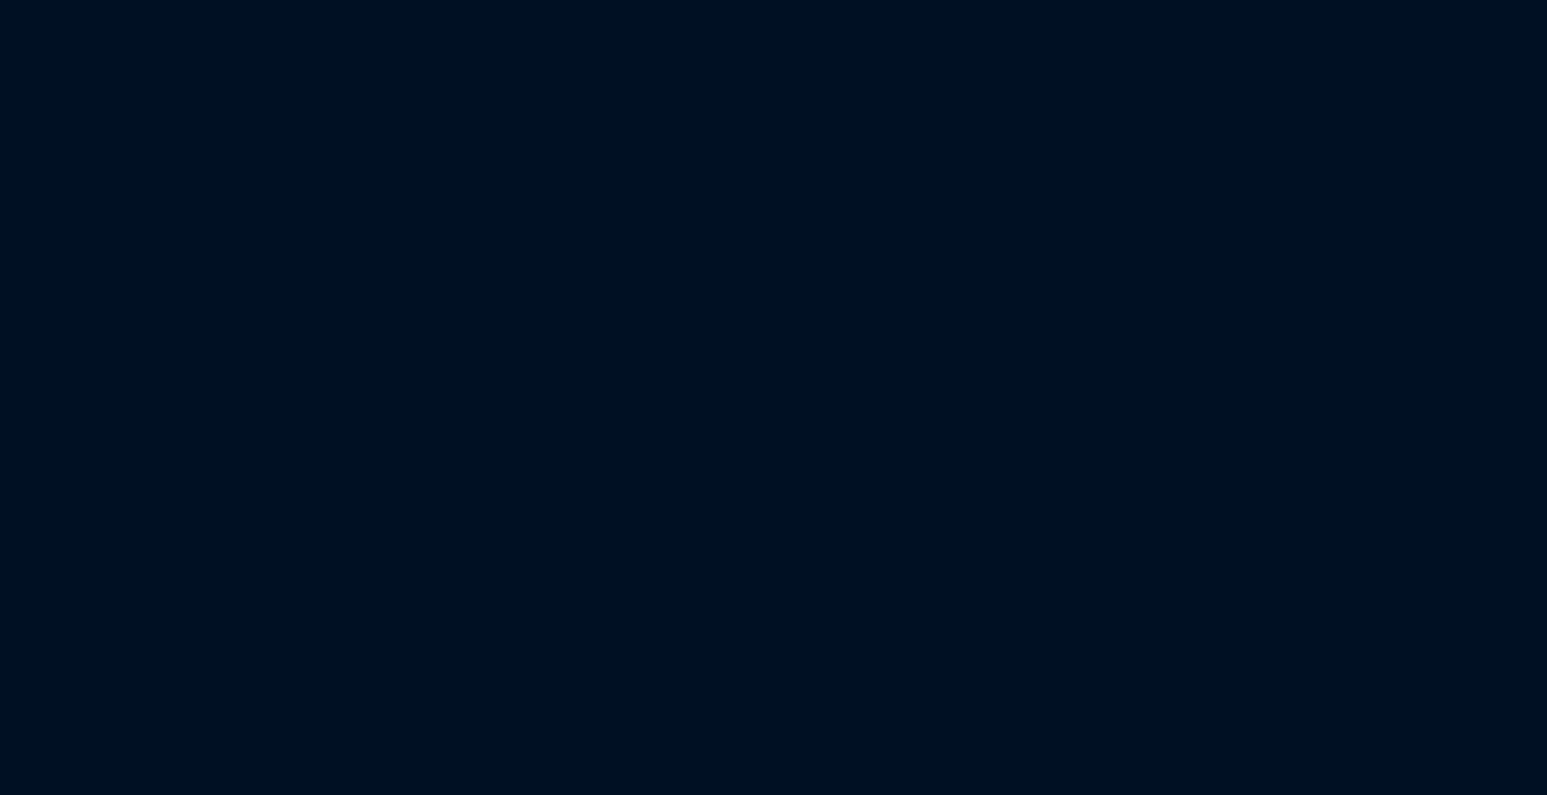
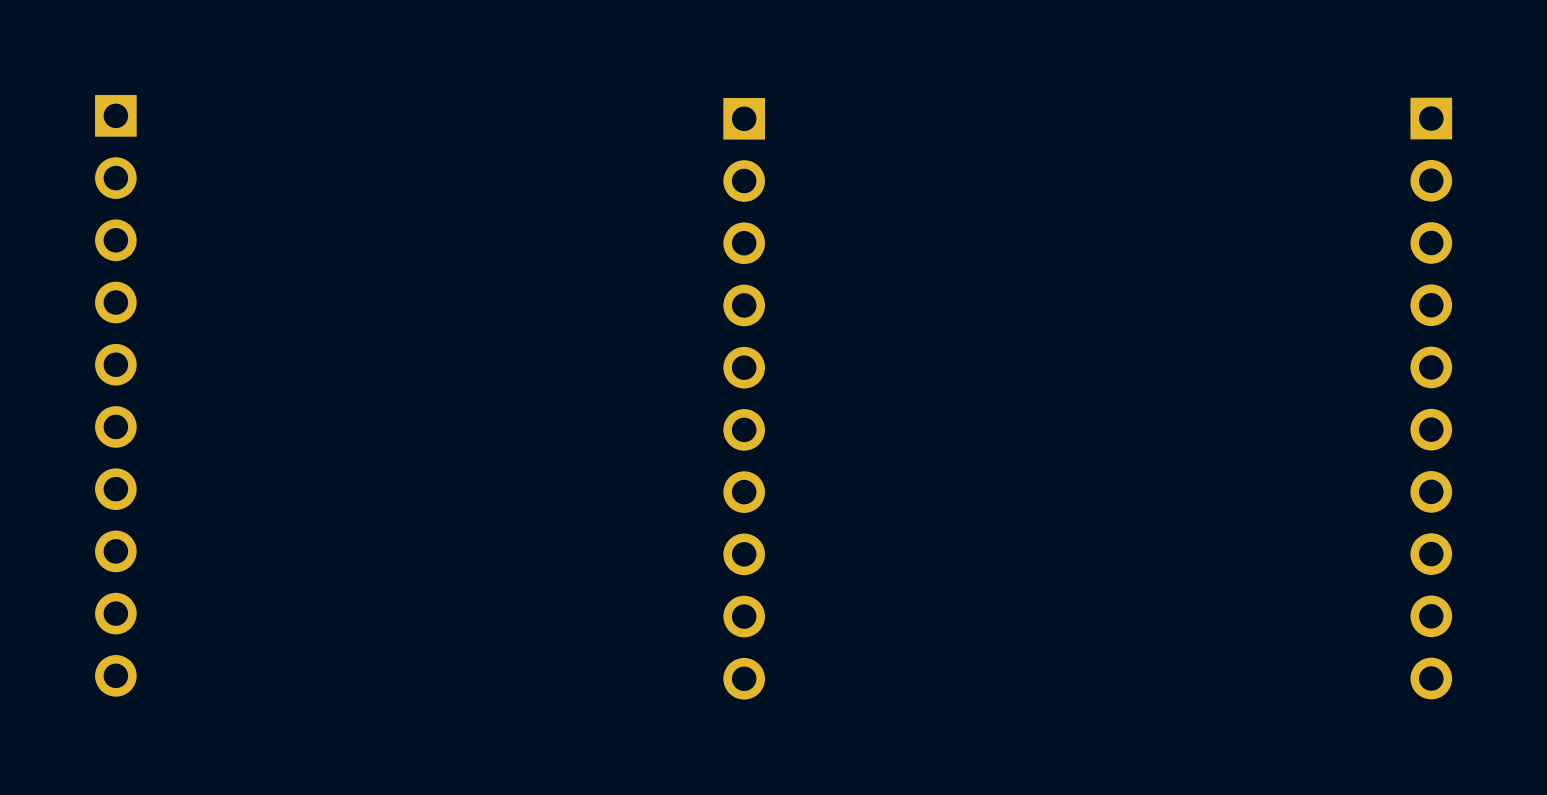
part: none -> (115, 395)
part: none -> (744, 398)
part: none -> (1431, 398)

